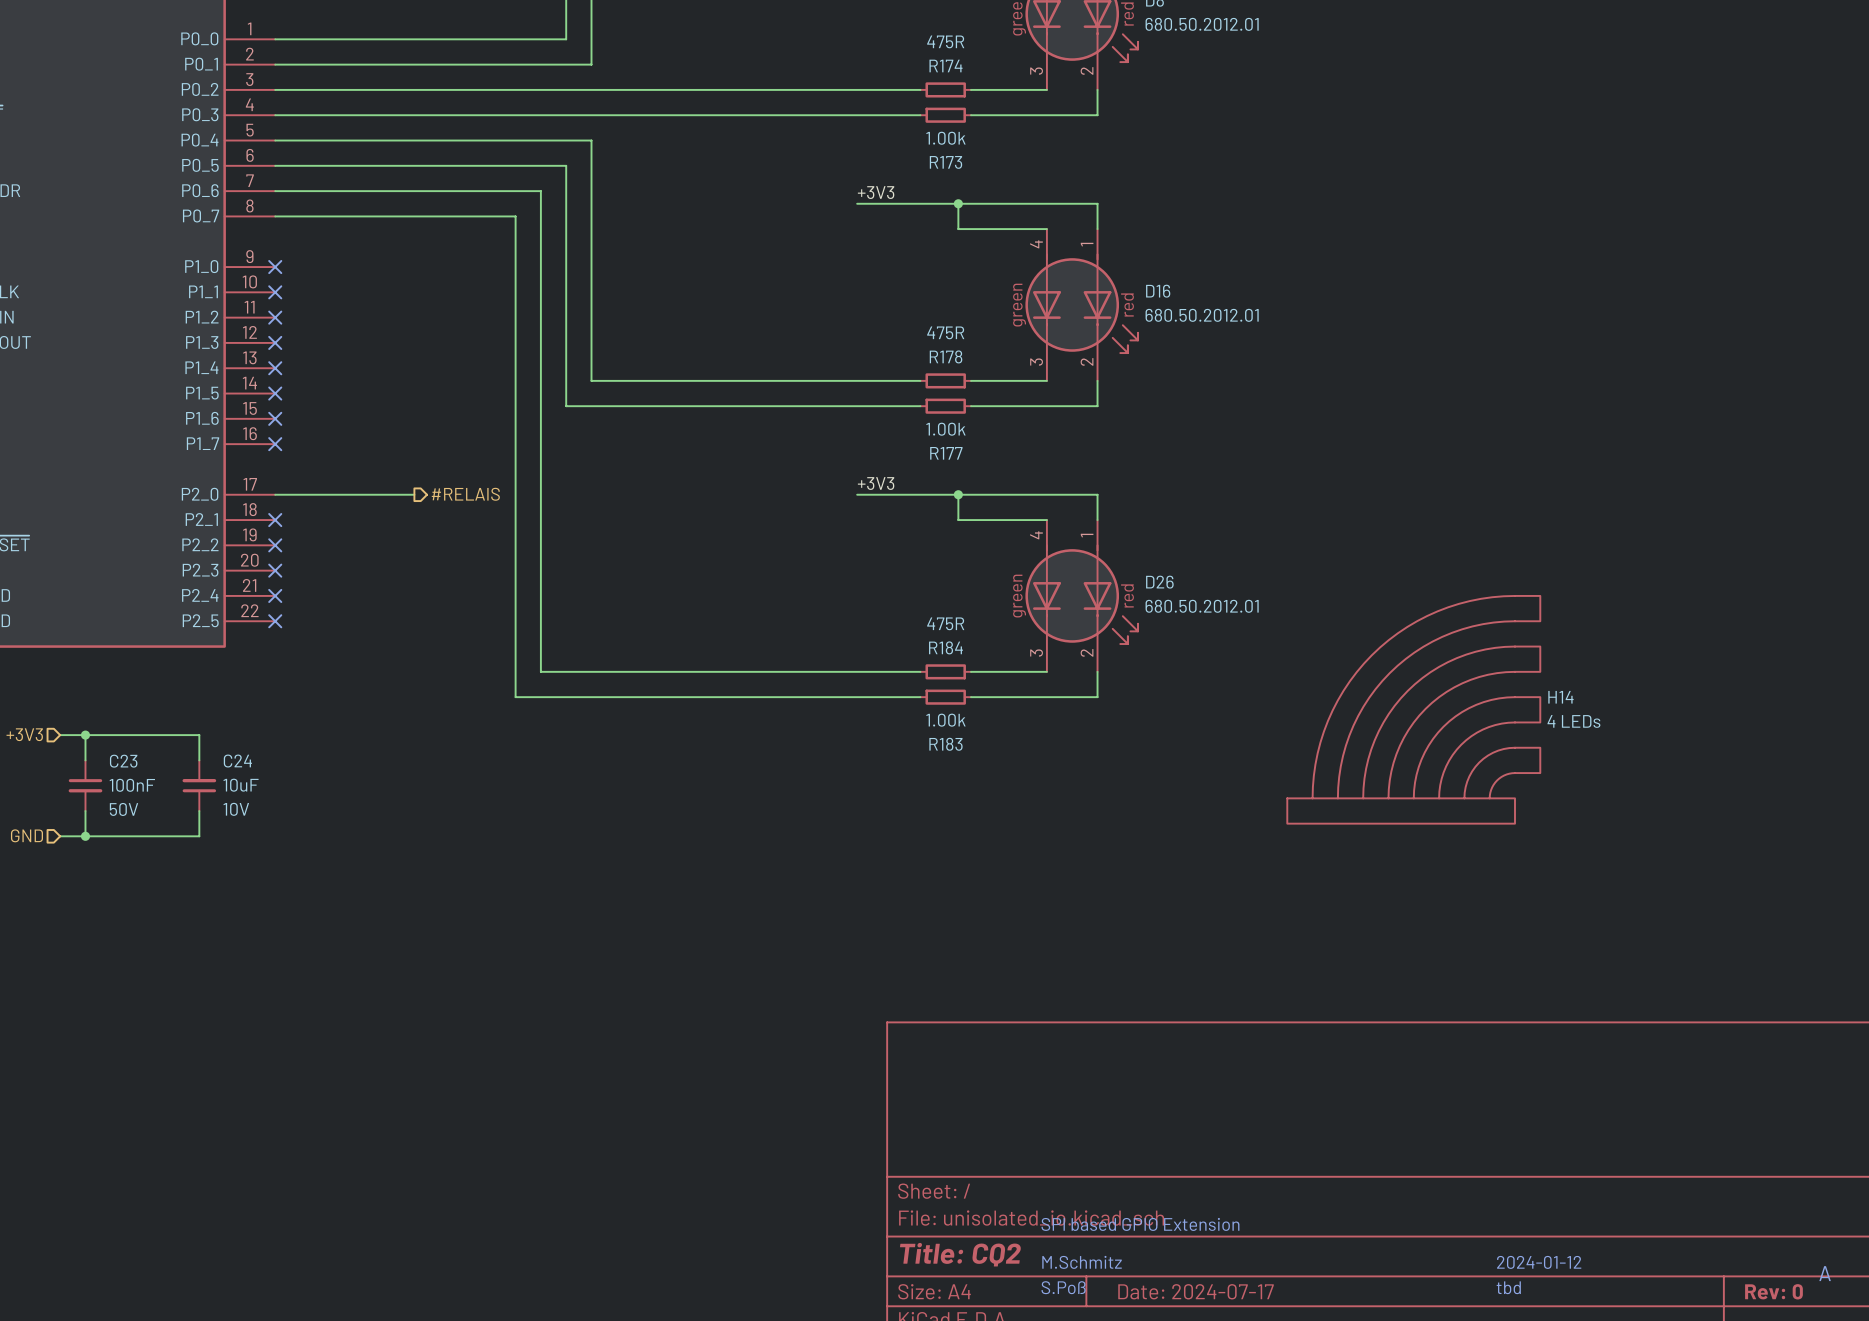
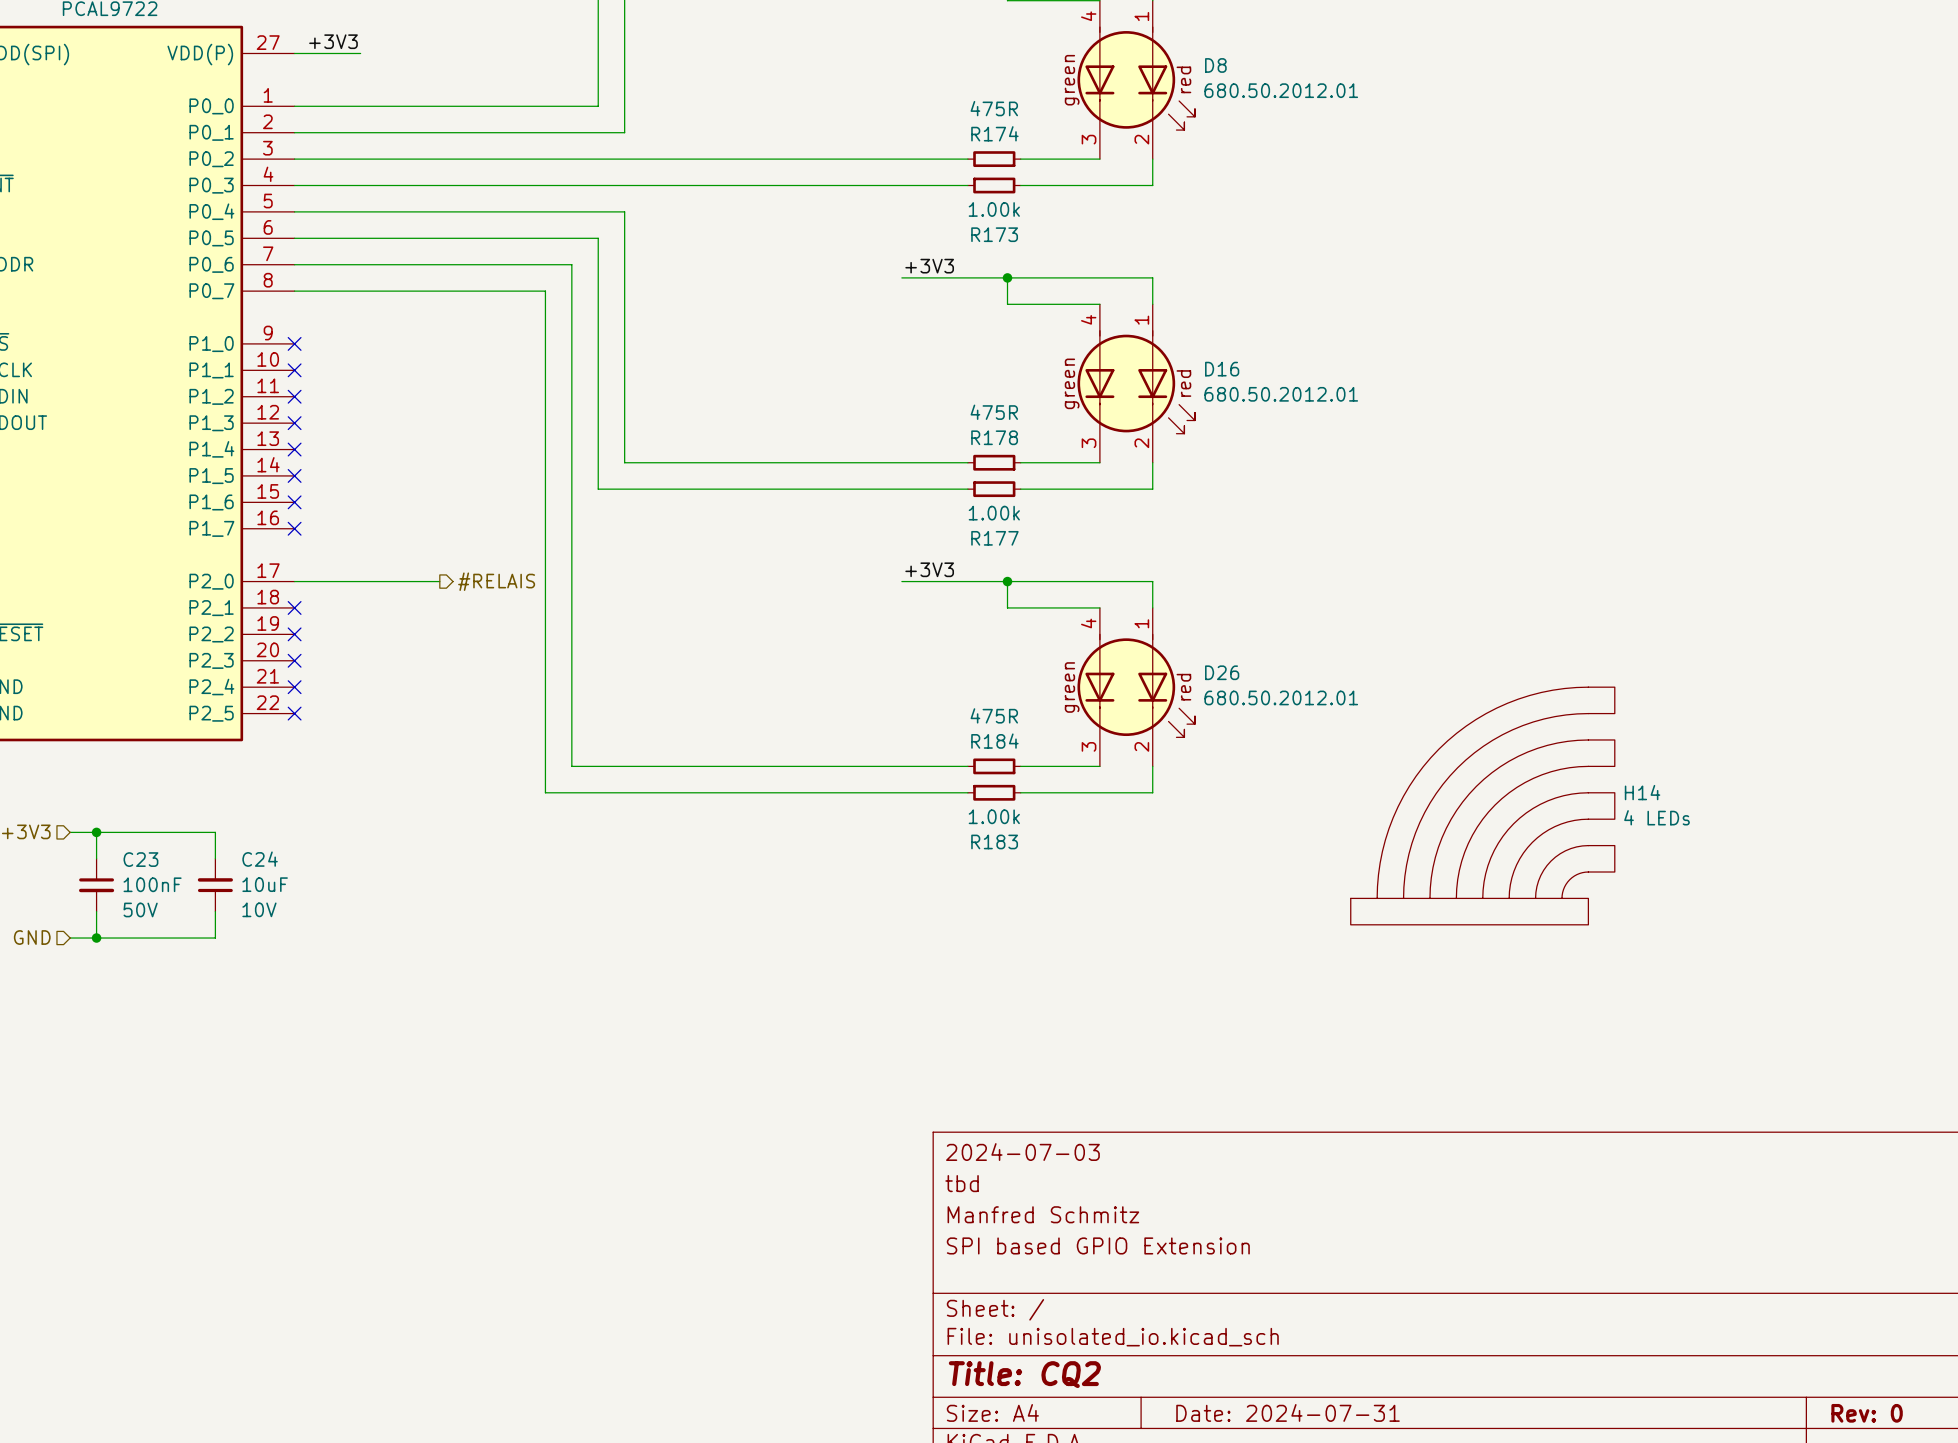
title block: none -> 2024-07-03 (1022, 1152)
title block: none -> tbd (962, 1183)
title block: none -> Manfred Schmitz (1043, 1214)
title block: none -> SPI based GPIO Extension (1098, 1245)
text: SPI based GPIO Extension (1140, 1224) -> none
text: M.Schmitz (1082, 1262) -> none
text: 2024-01-12 (1539, 1262) -> none
text: A (1825, 1273) -> none
text: S.Poß (1063, 1287) -> none
text: tbd (1508, 1287) -> none
title block: Date: 2024-07-17 (1196, 1291) -> Date: 2024-07-31 (1288, 1412)

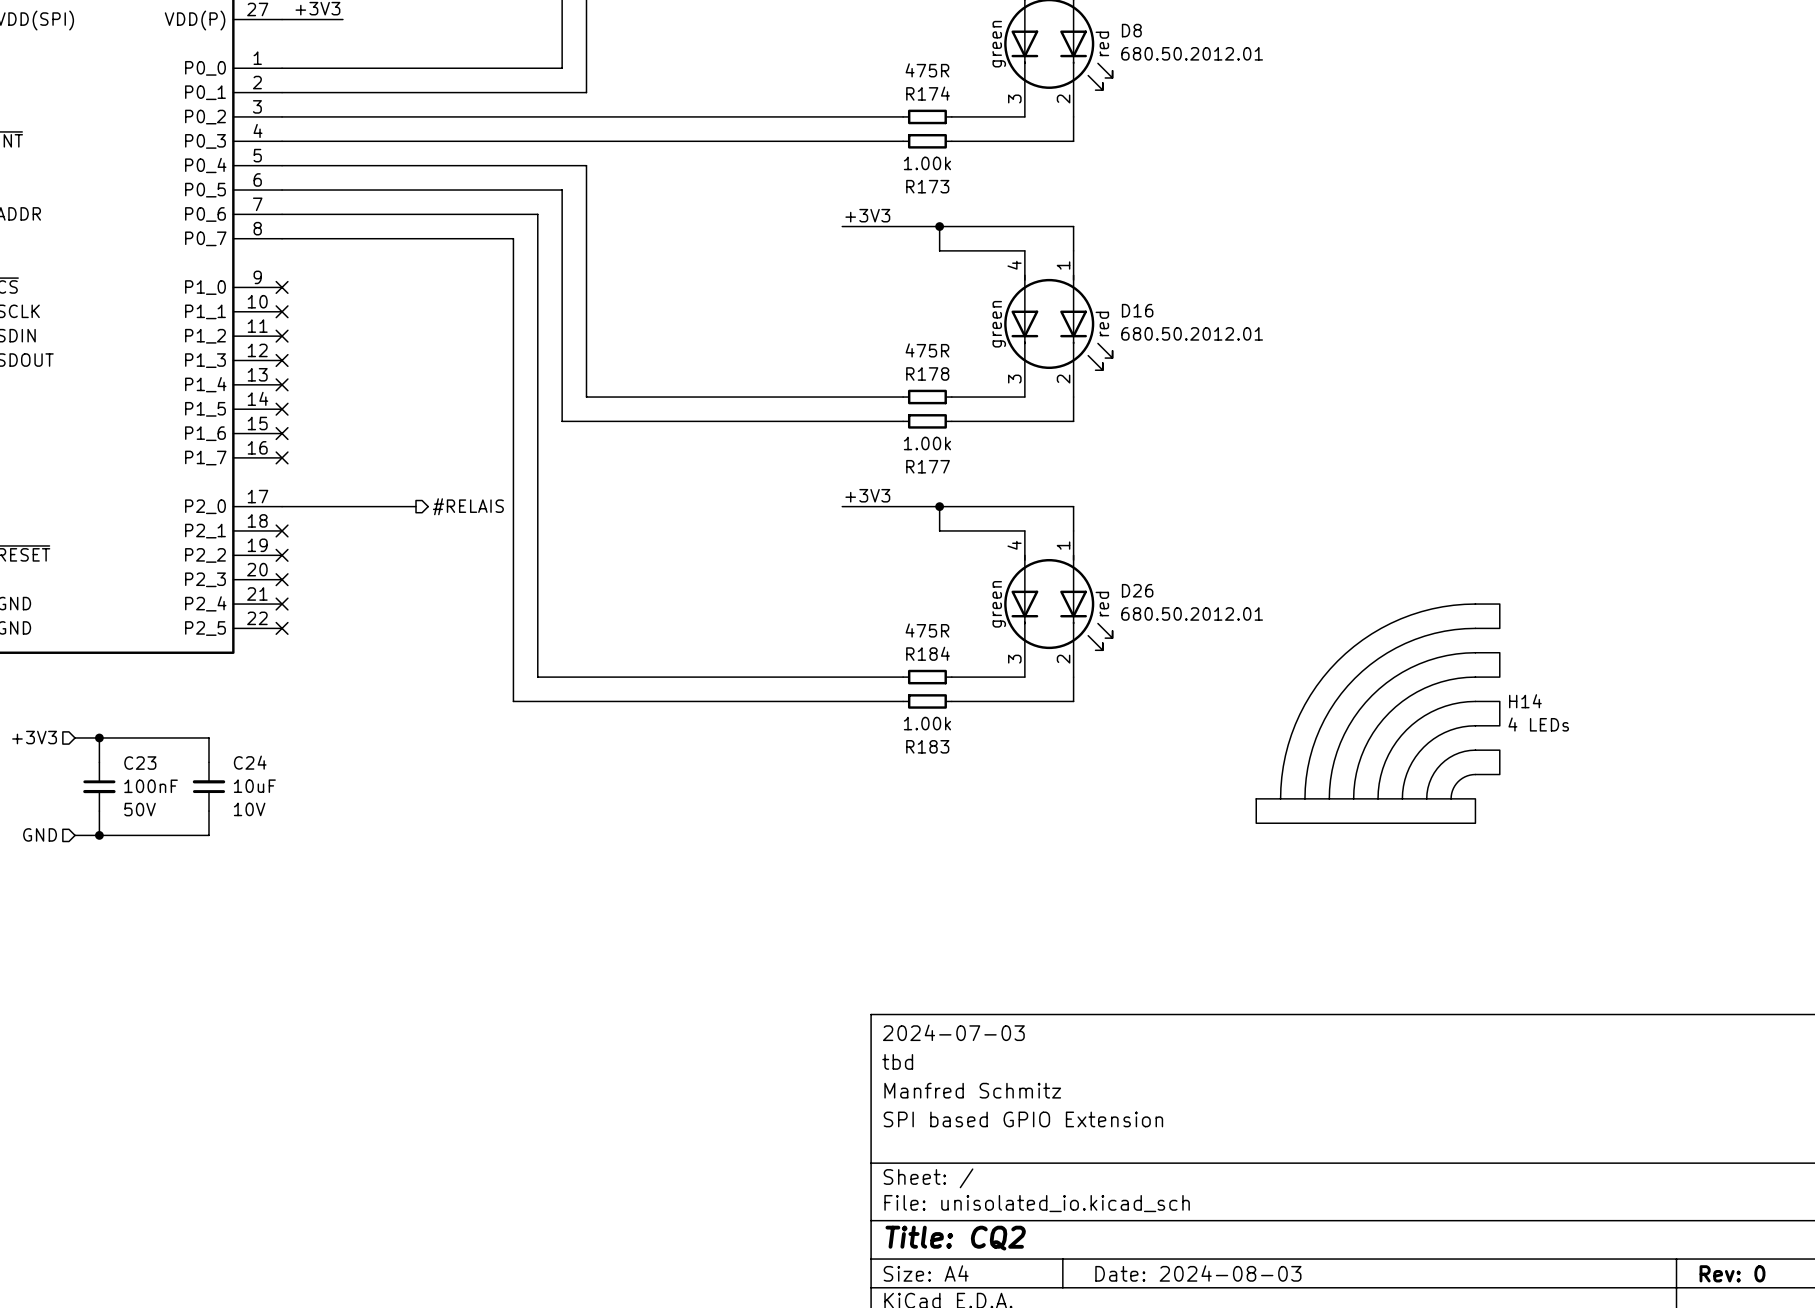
title block: Date: 2024-07-31 (1288, 1412) -> Date: 2024-08-03 (1198, 1273)

